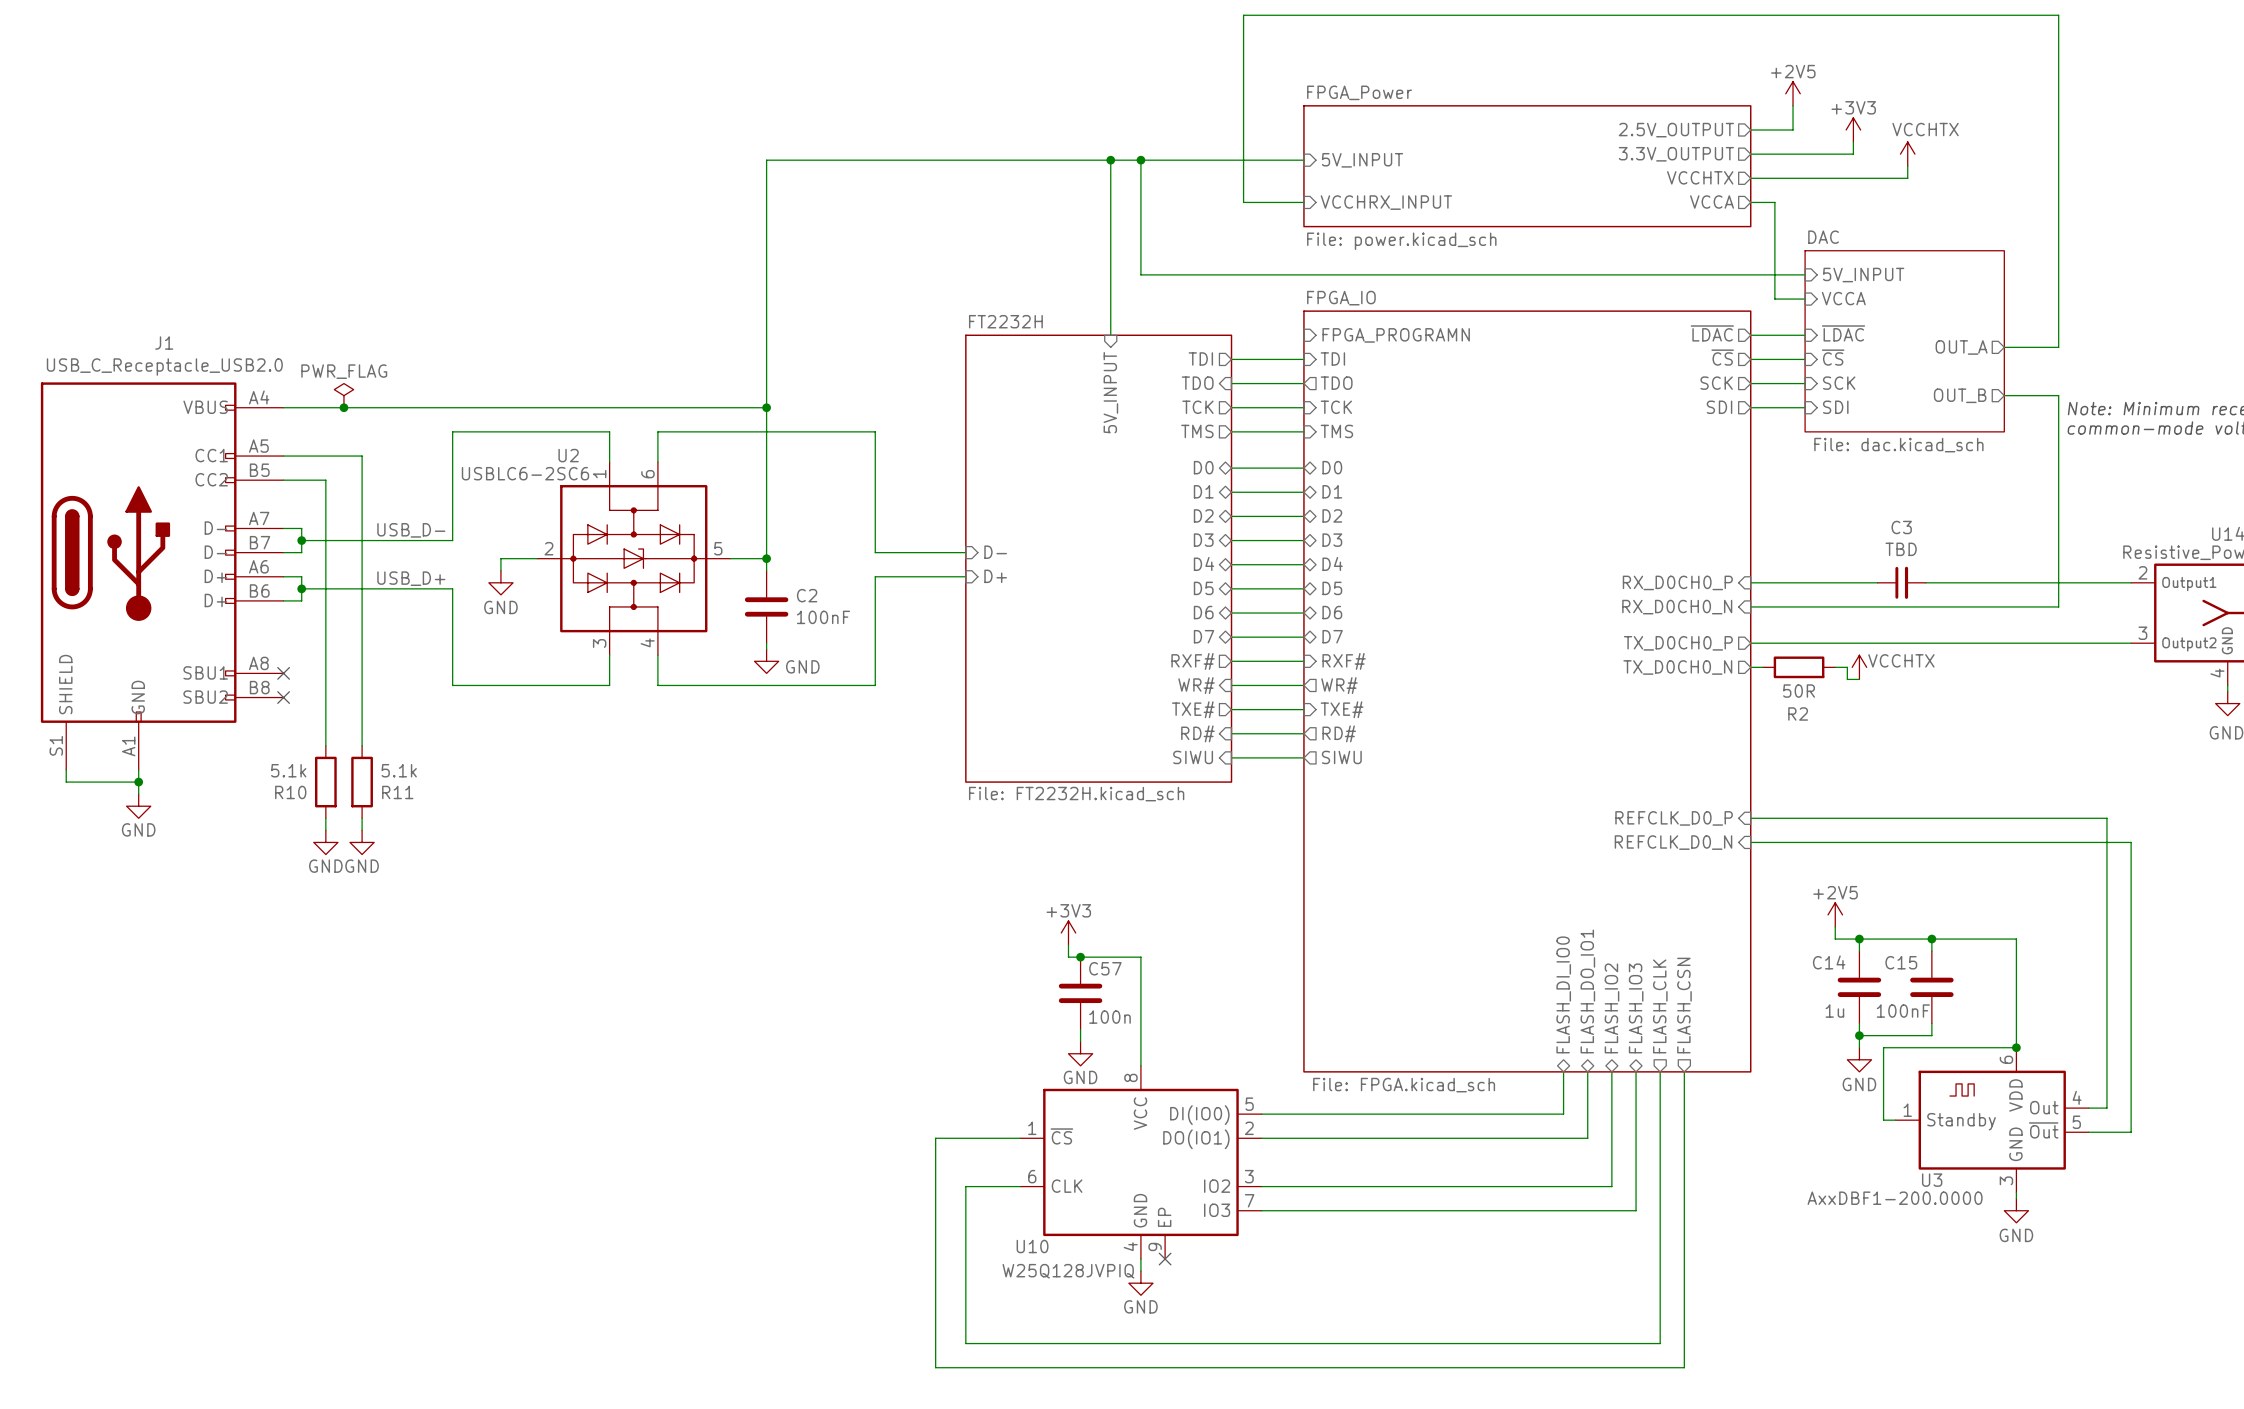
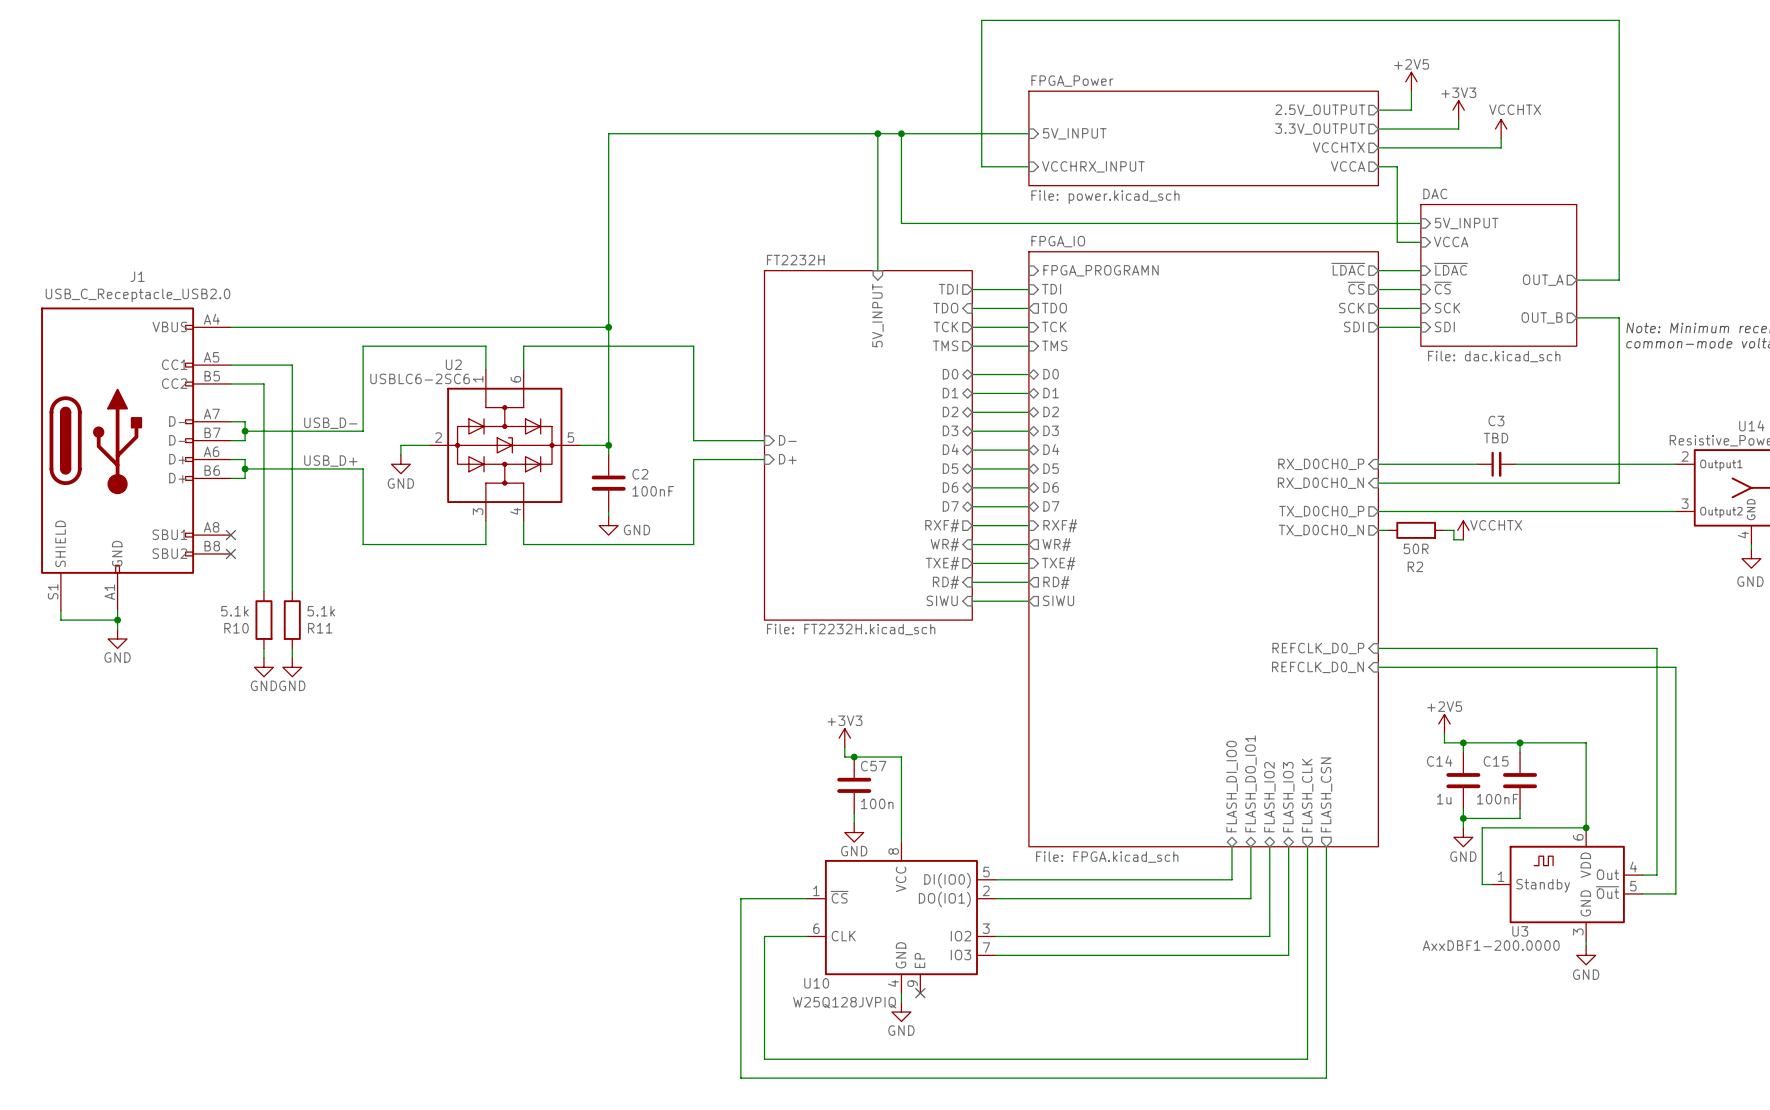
power symbol: PWR_FLAG (343, 395) -> none
junction: (343, 407) -> none

